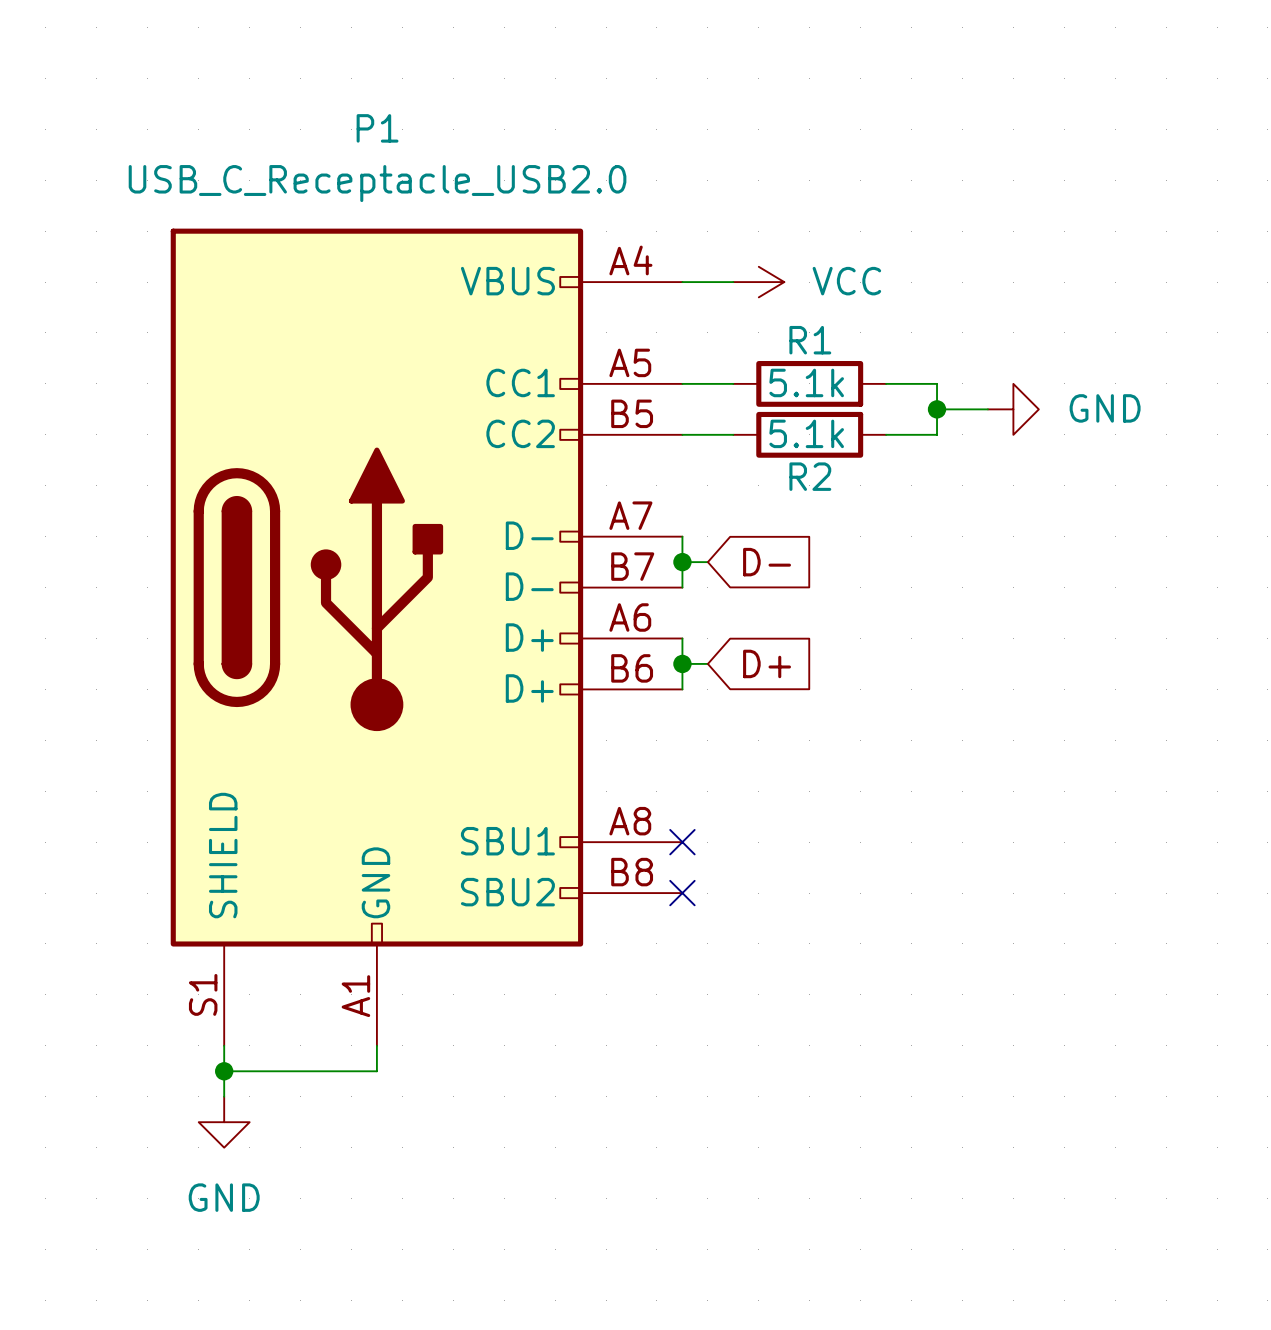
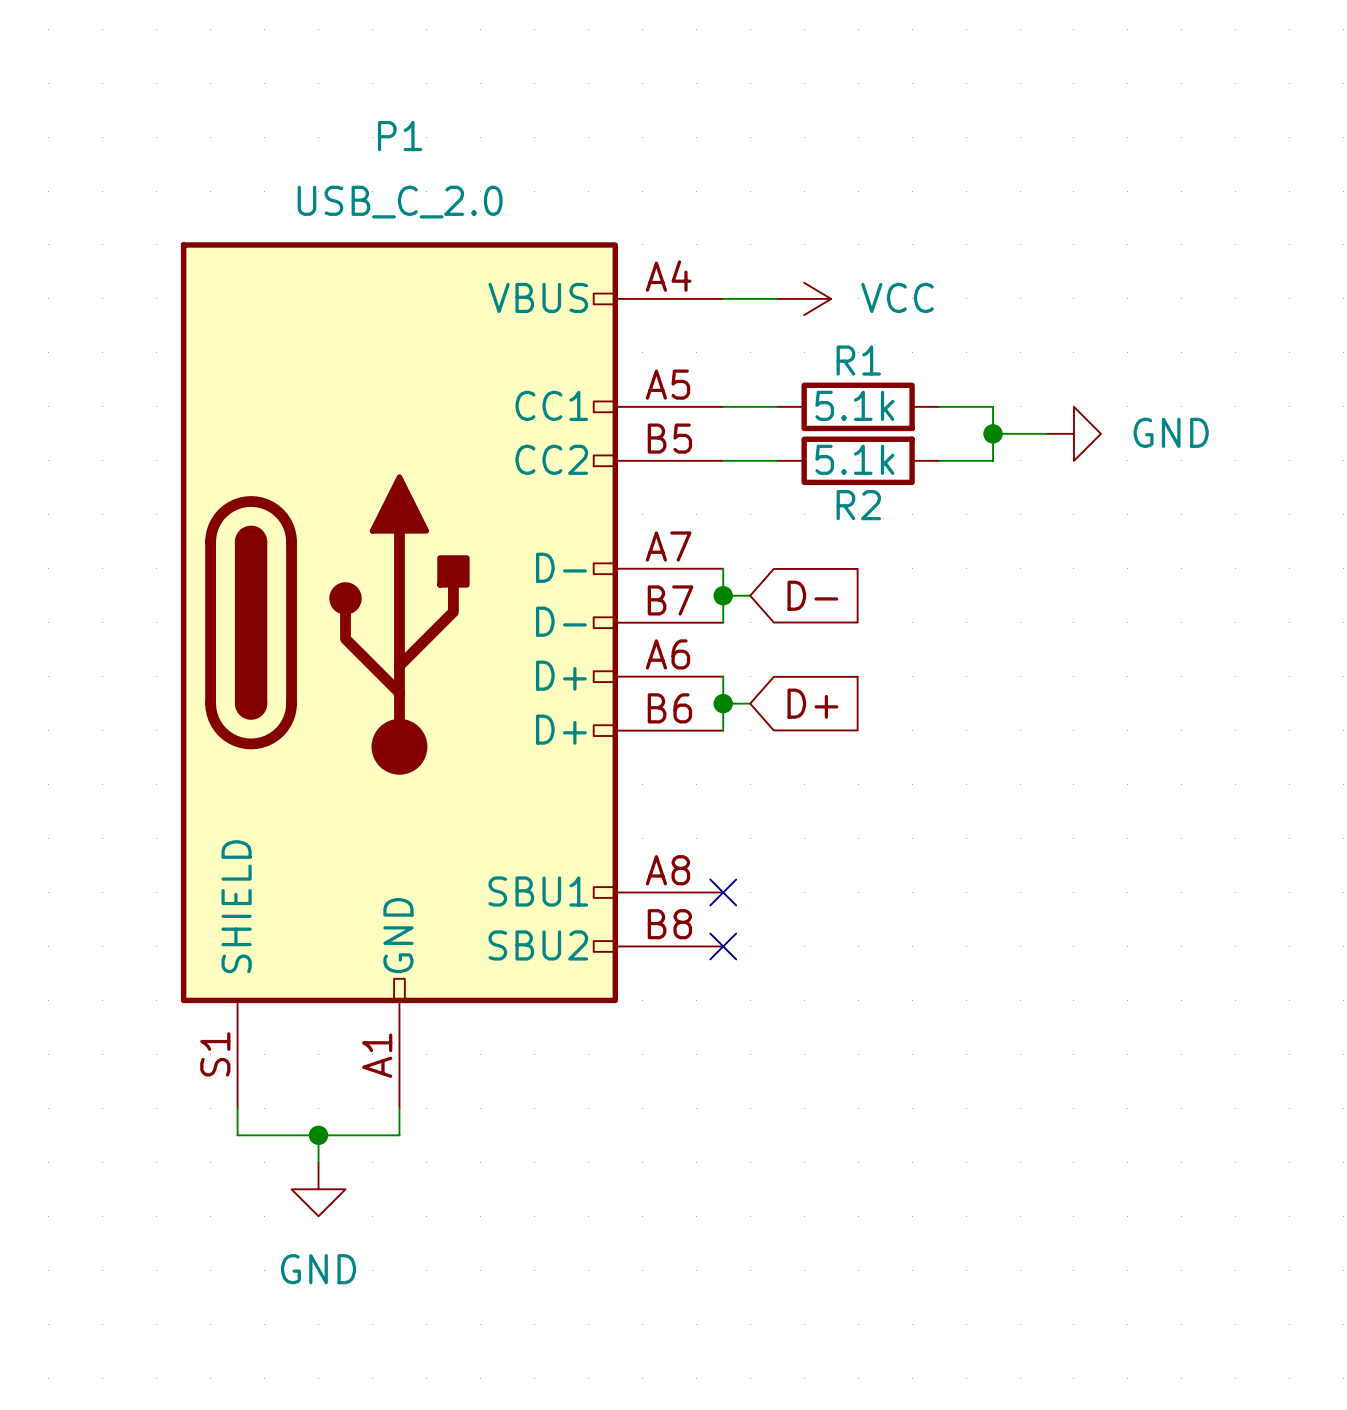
P1 value: USB_C_Receptacle_USB2.0 (377, 183) -> USB_C_2.0 (400, 202)
wire: (224, 1071) (224, 1096) -> (318, 1135) (318, 1162)
junction position: (224, 1071) -> (318, 1135)
power symbol position: GND (224, 1122) -> GND (318, 1189)

